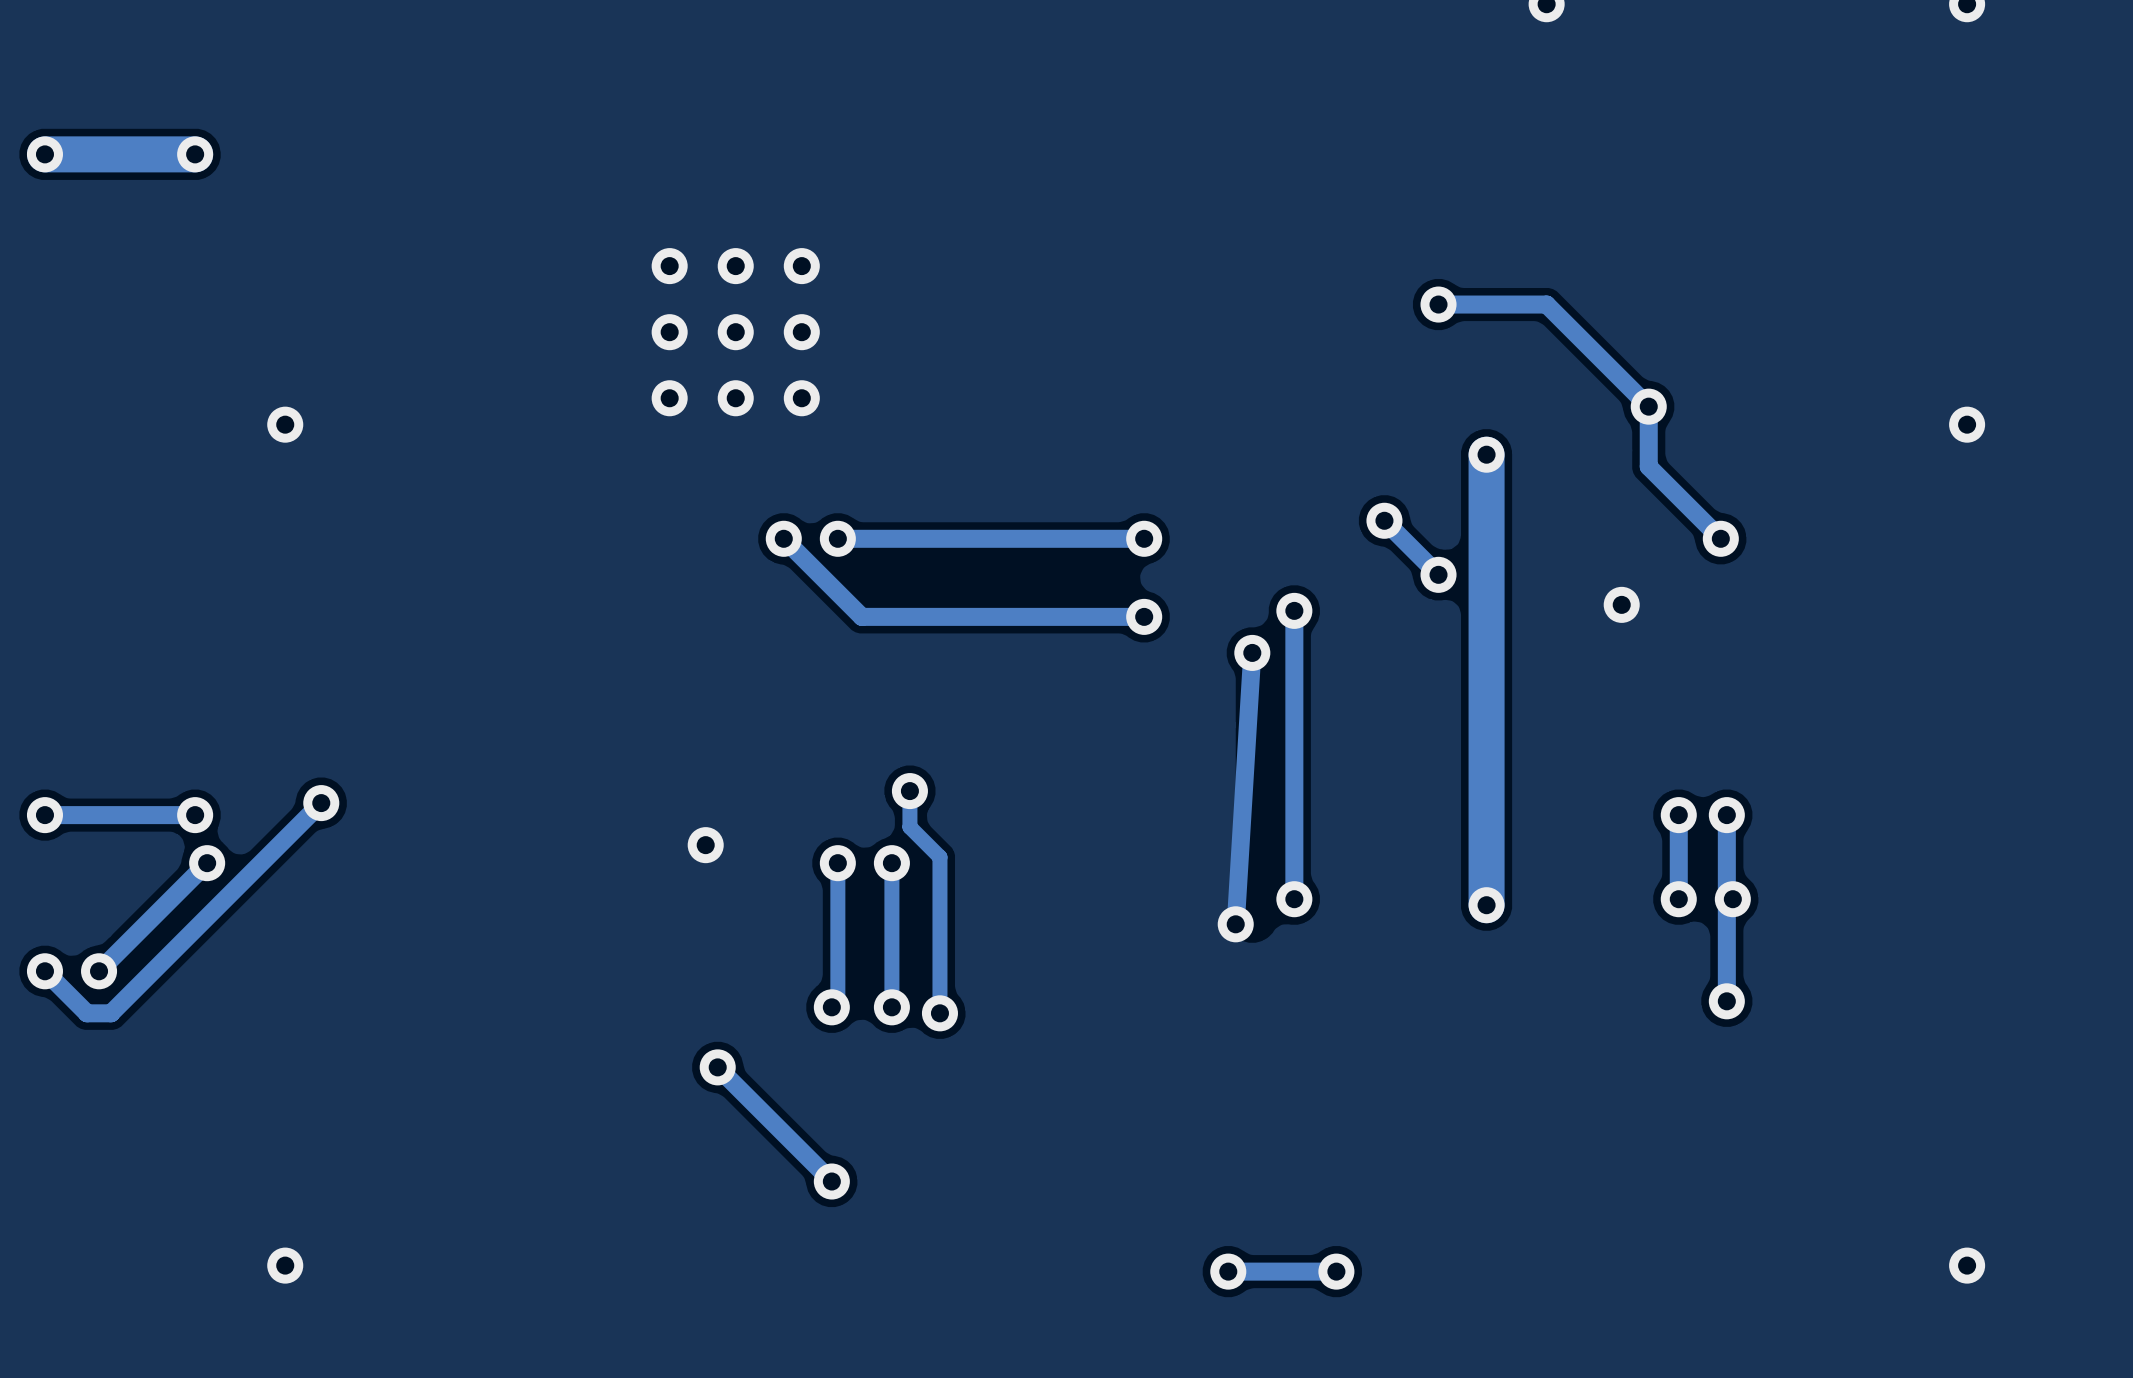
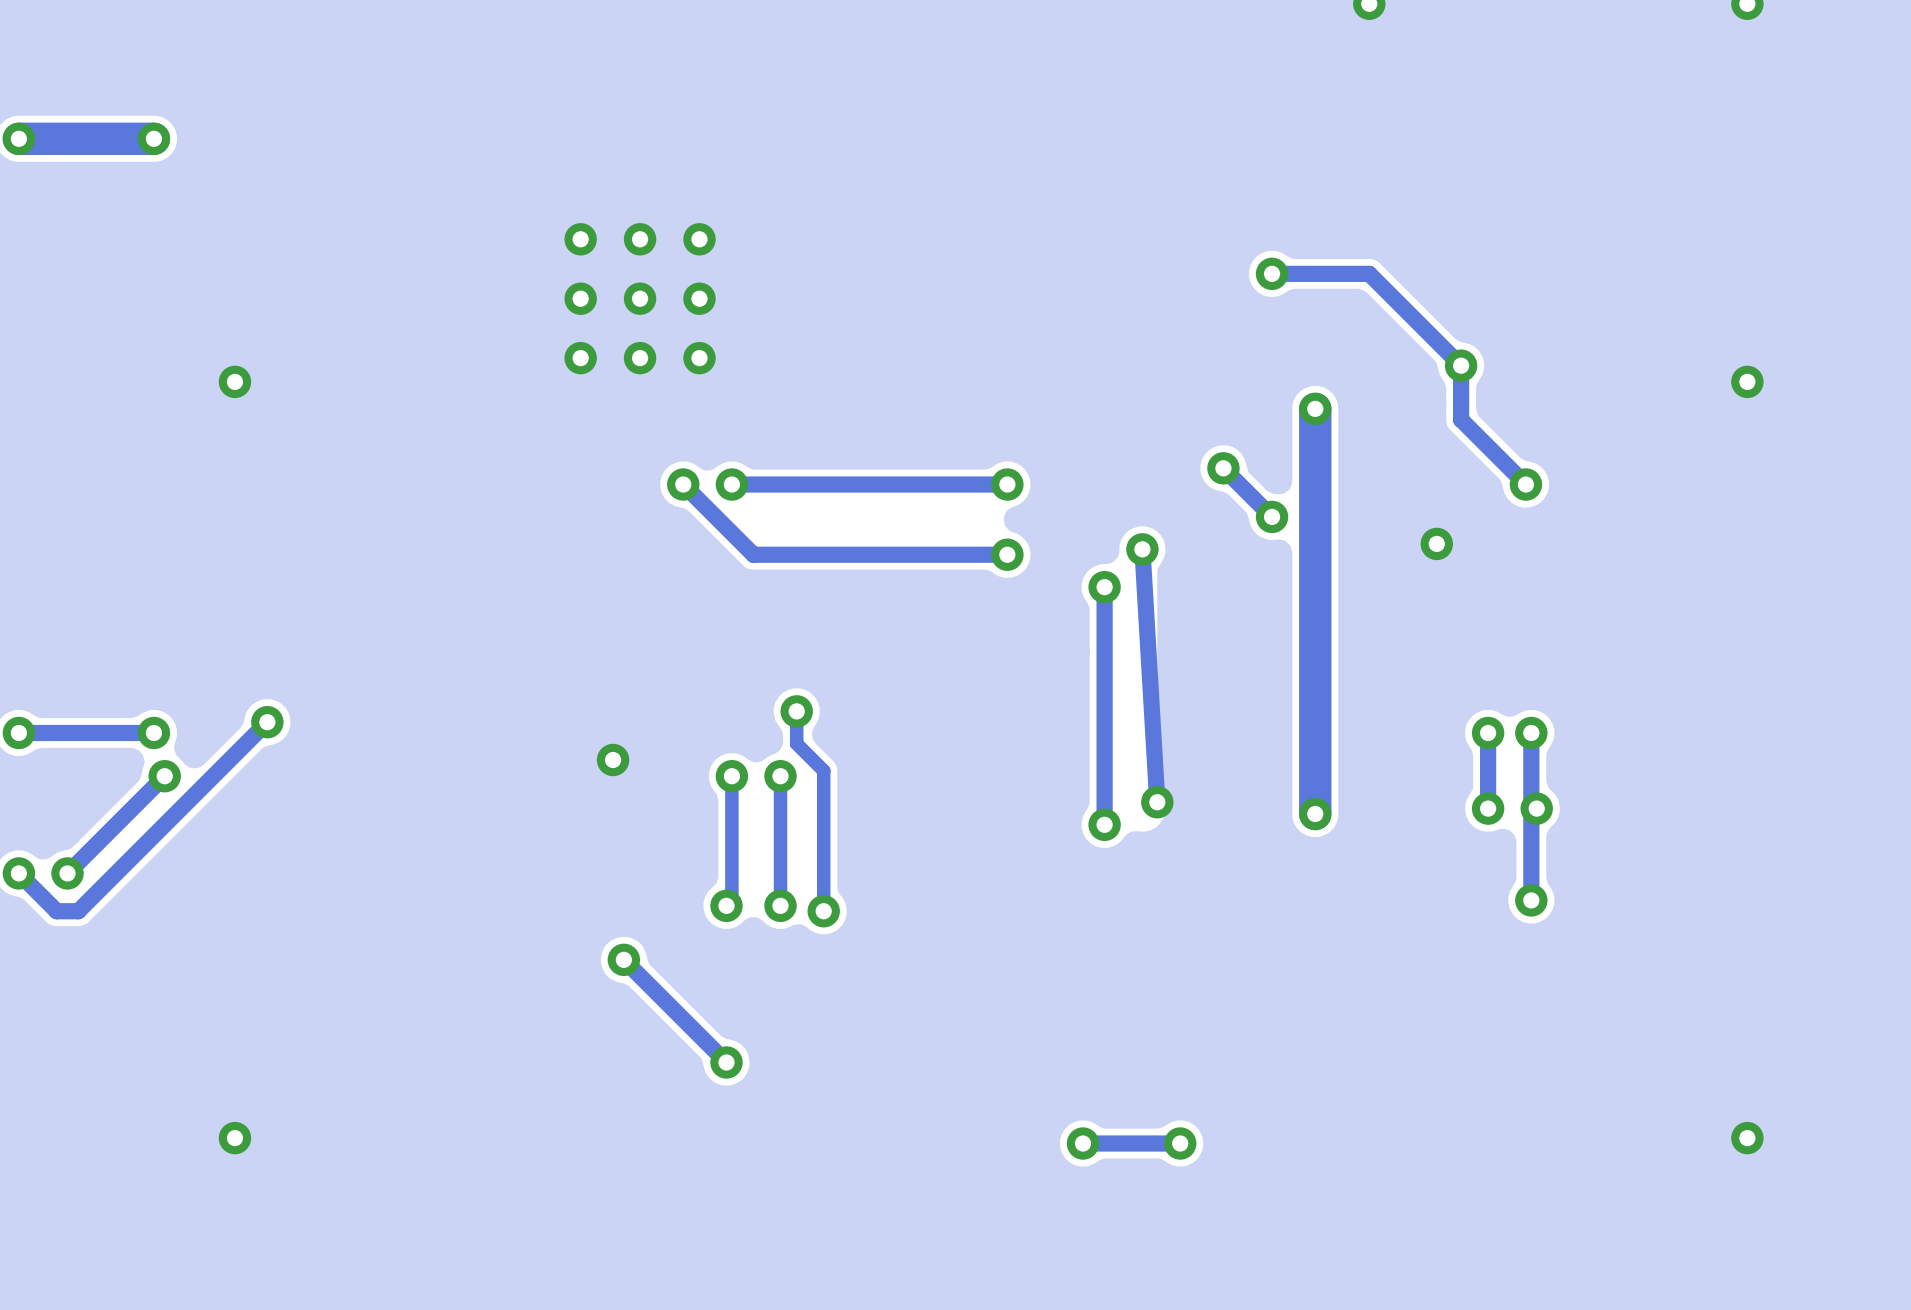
track: (1294, 610) (1294, 899) -> (1142, 549) (1157, 802)
track: (1252, 652) (1235, 924) -> (1104, 587) (1104, 824)
via position: (1294, 899) -> (1157, 802)
via position: (1235, 924) -> (1104, 824)

